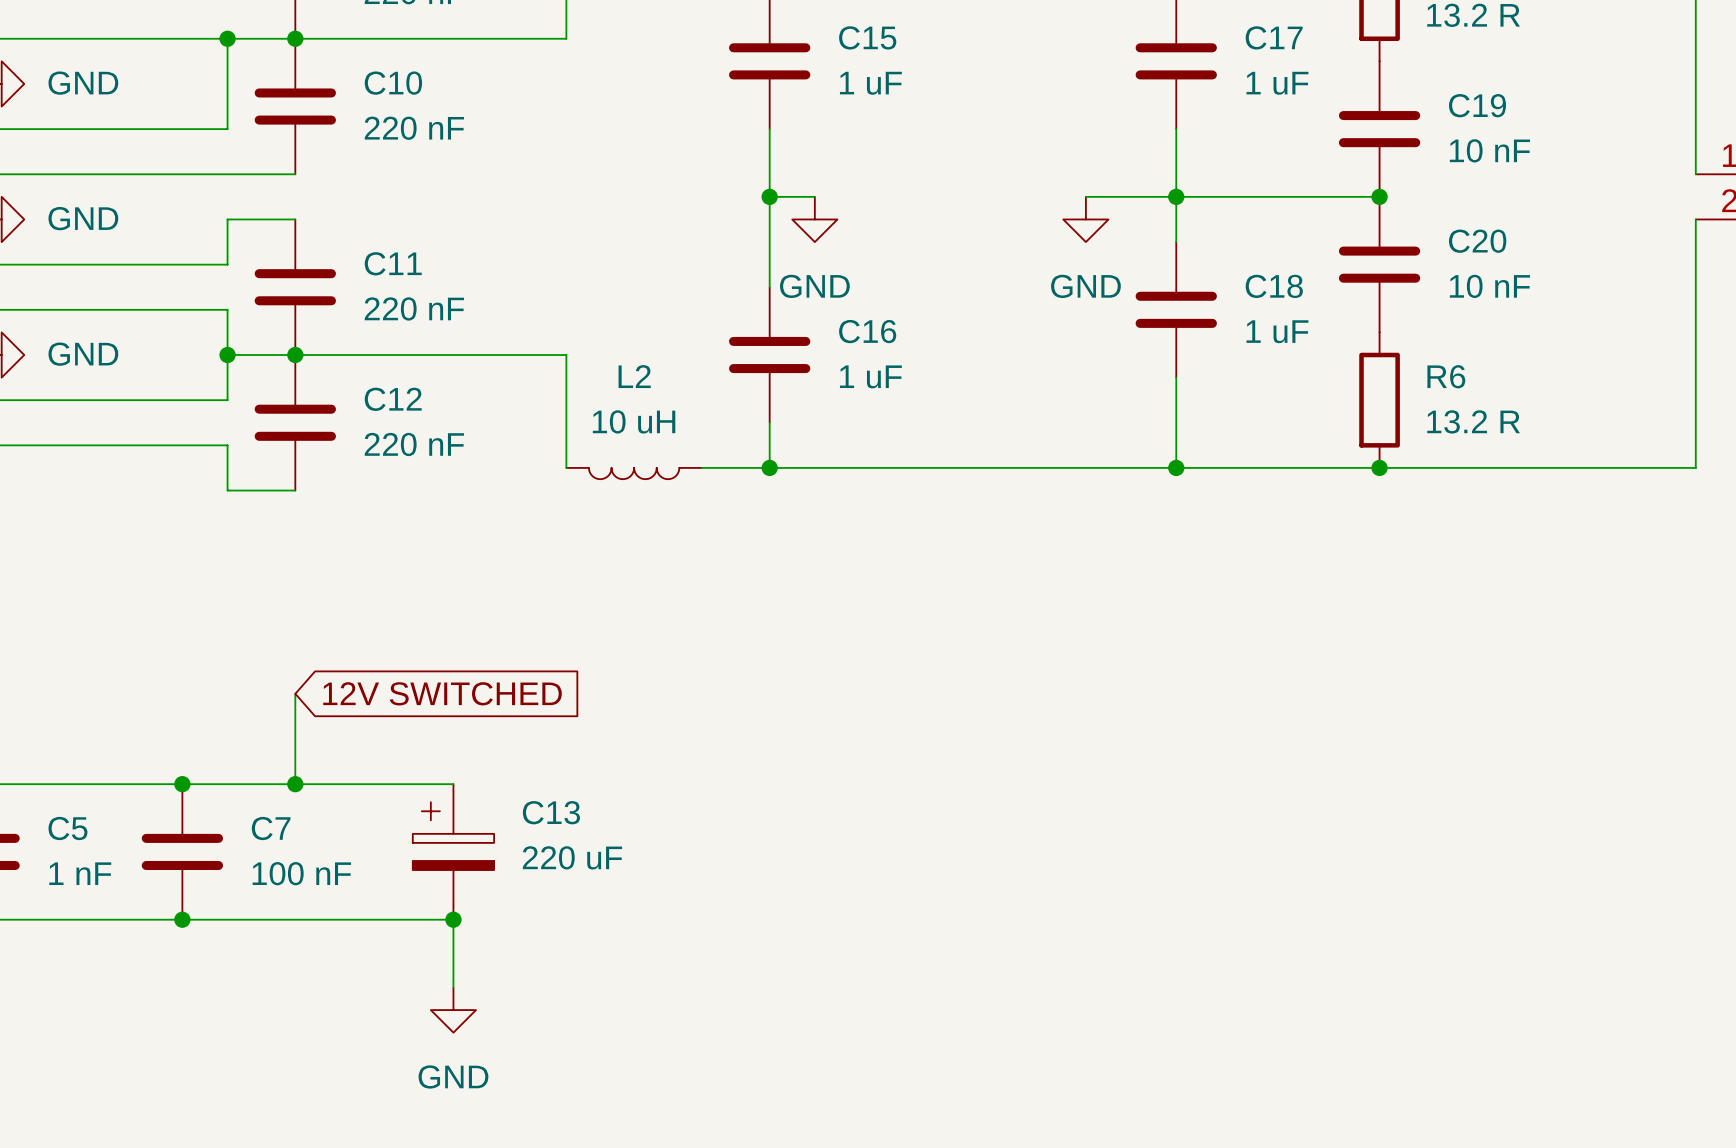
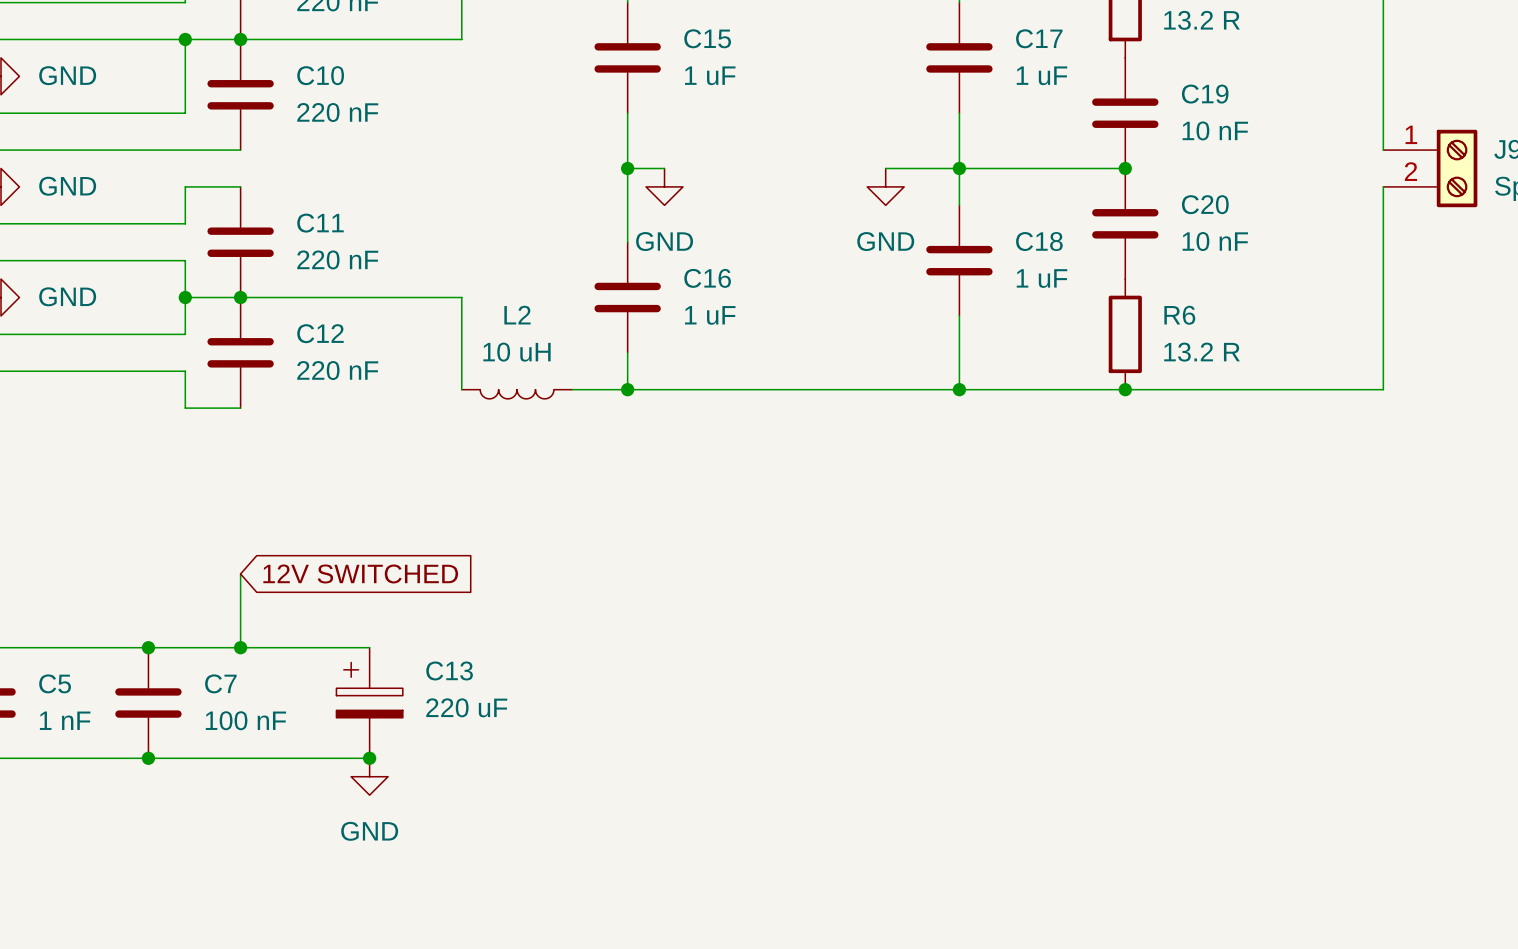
wire: (453, 919) (453, 987) -> none
power symbol position: GND (453, 1010) -> GND (369, 776)

